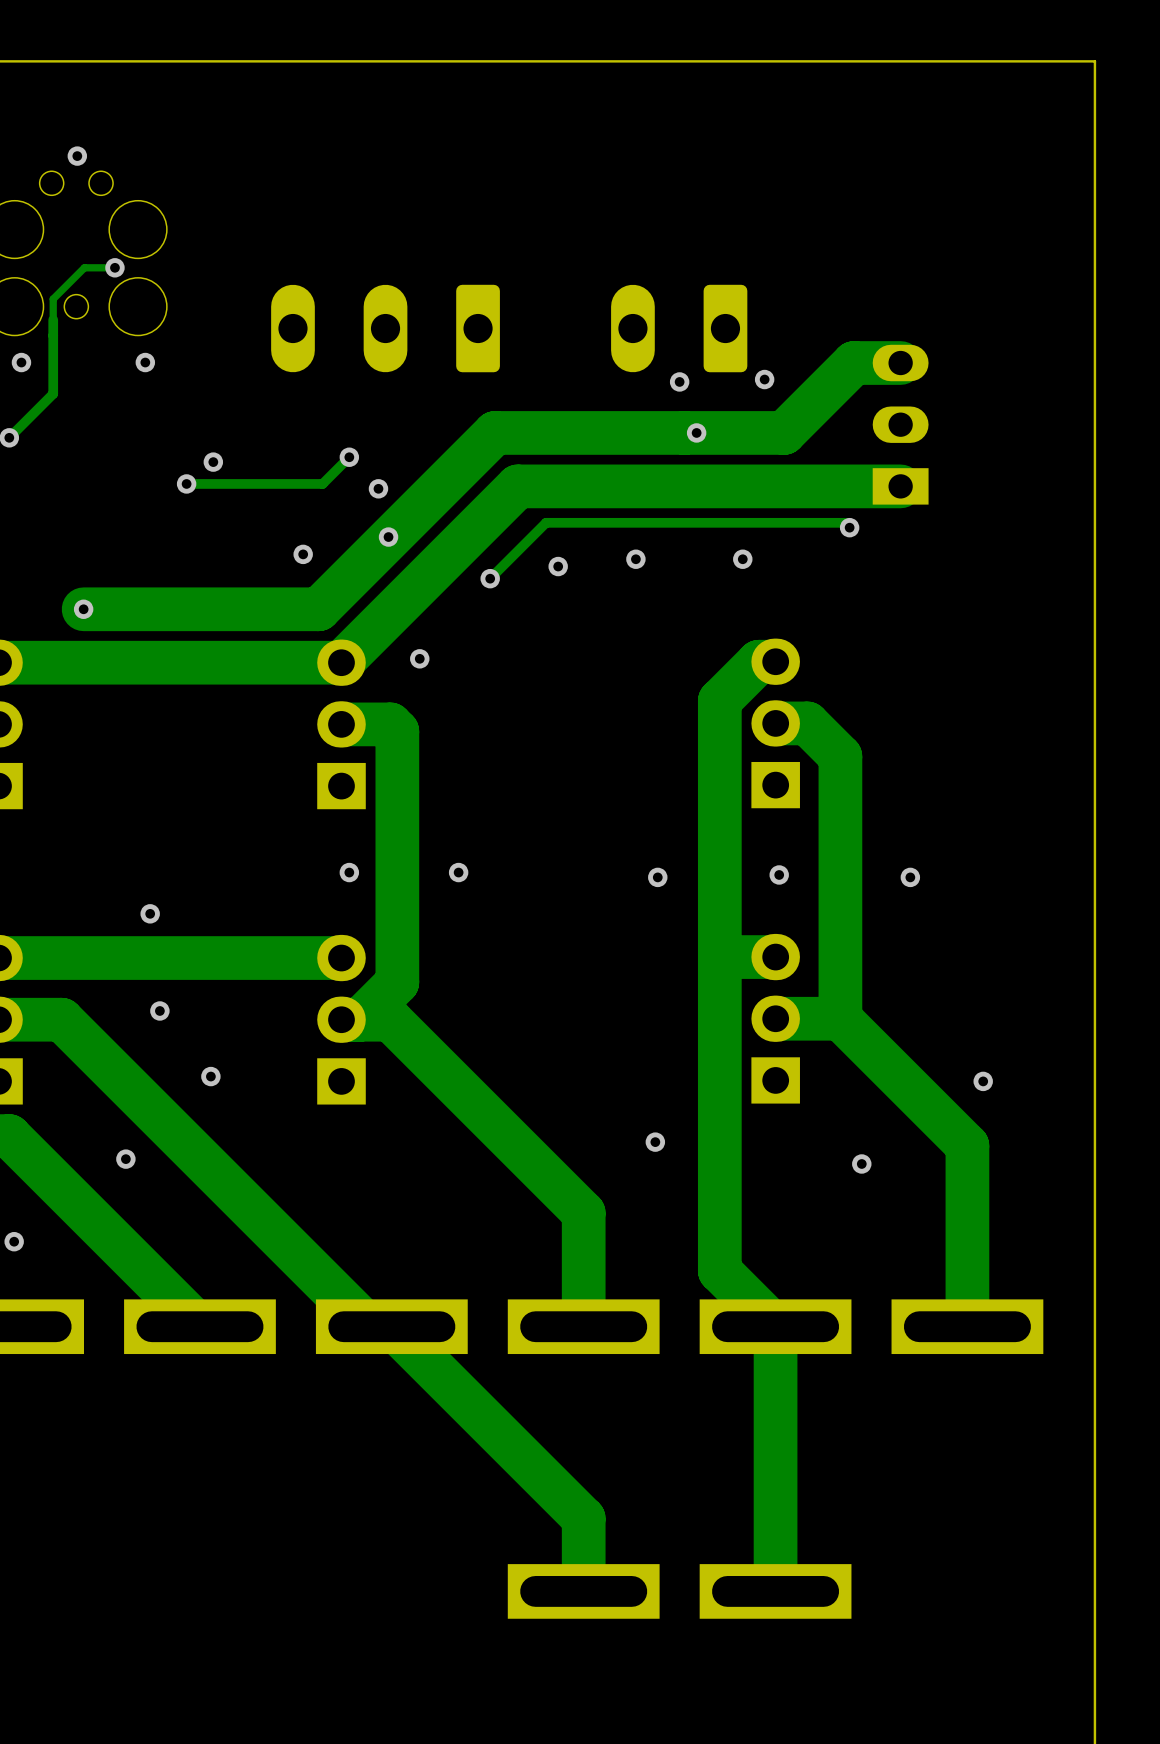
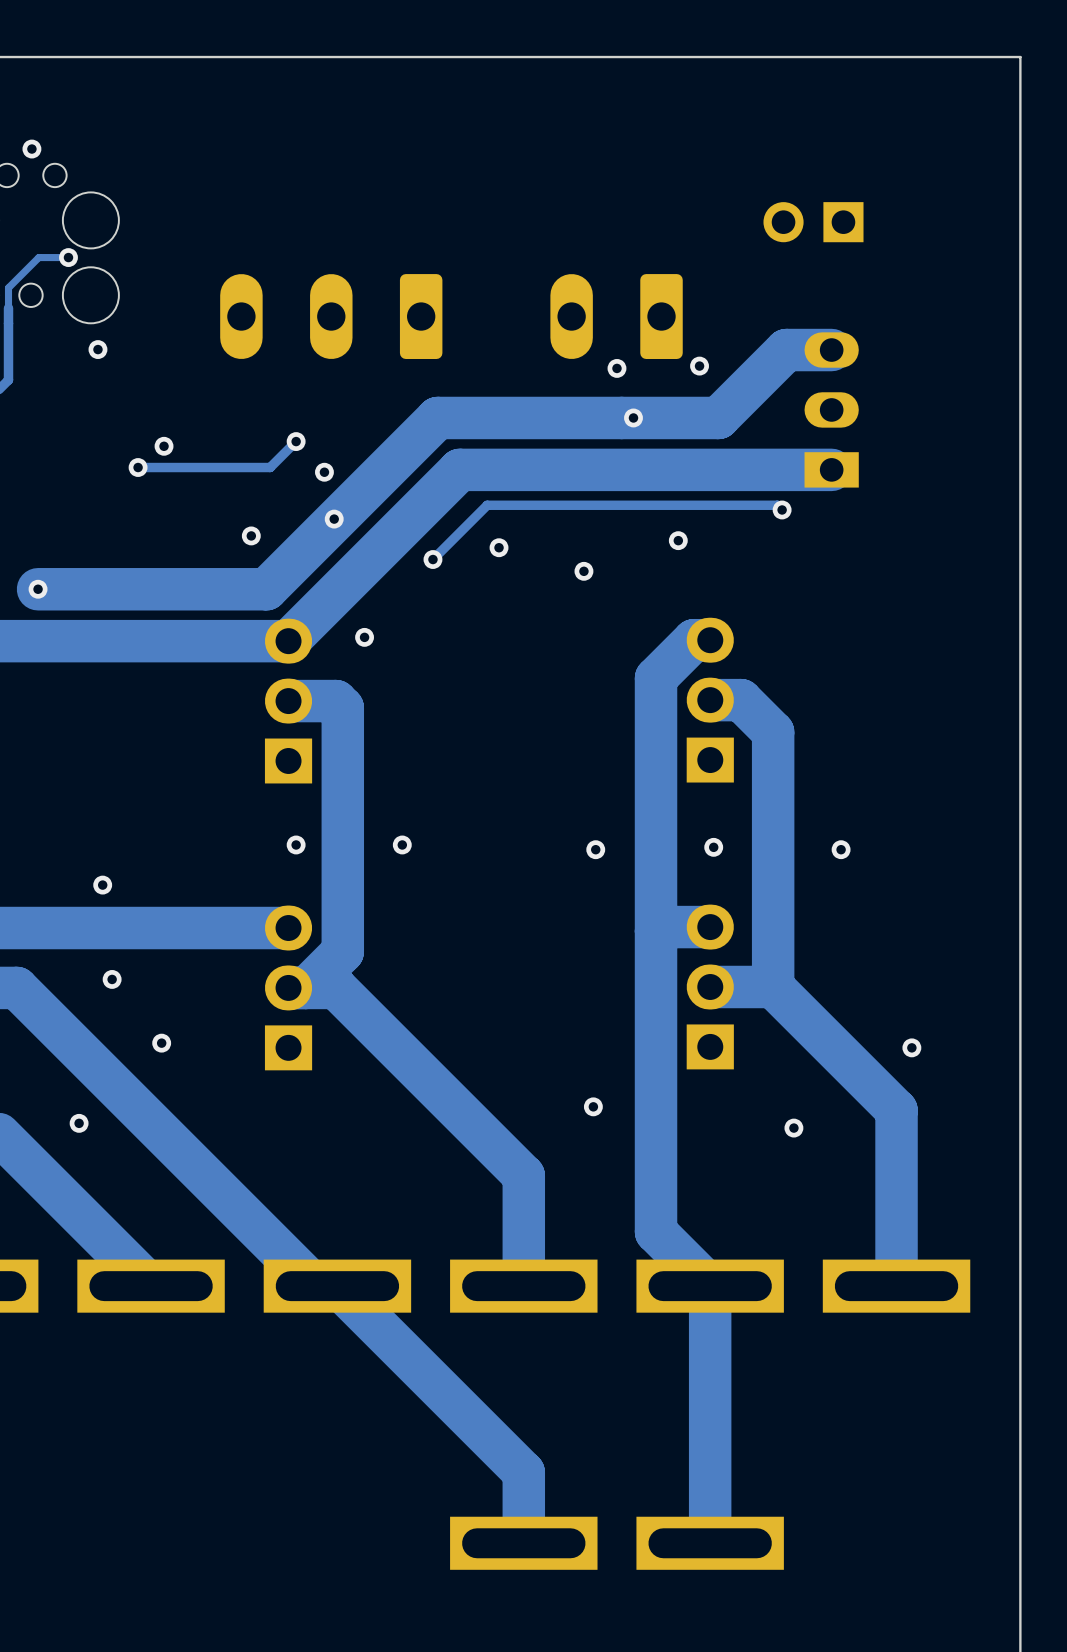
part: none -> (813, 222)
via position: (635, 559) -> (583, 571)

